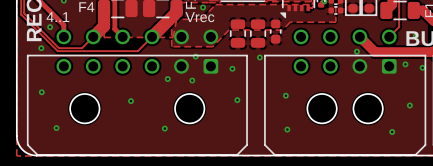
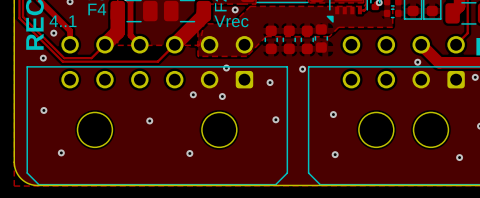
part footprint: [230, 19, 246, 48] -> [264, 25, 278, 55]
part: none -> (289, 39)
part: none -> (307, 39)
part: (258, 33) -> none

